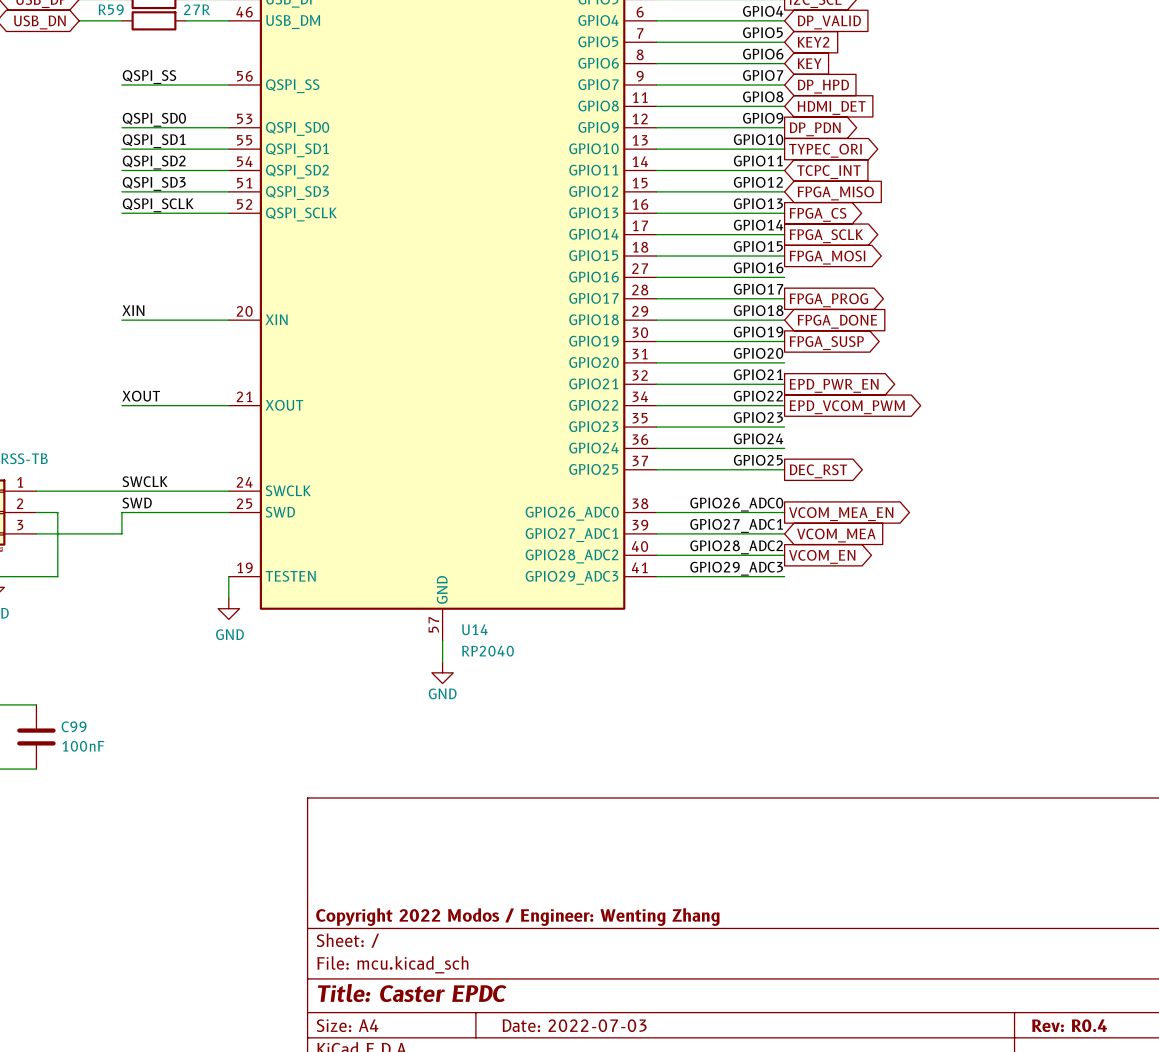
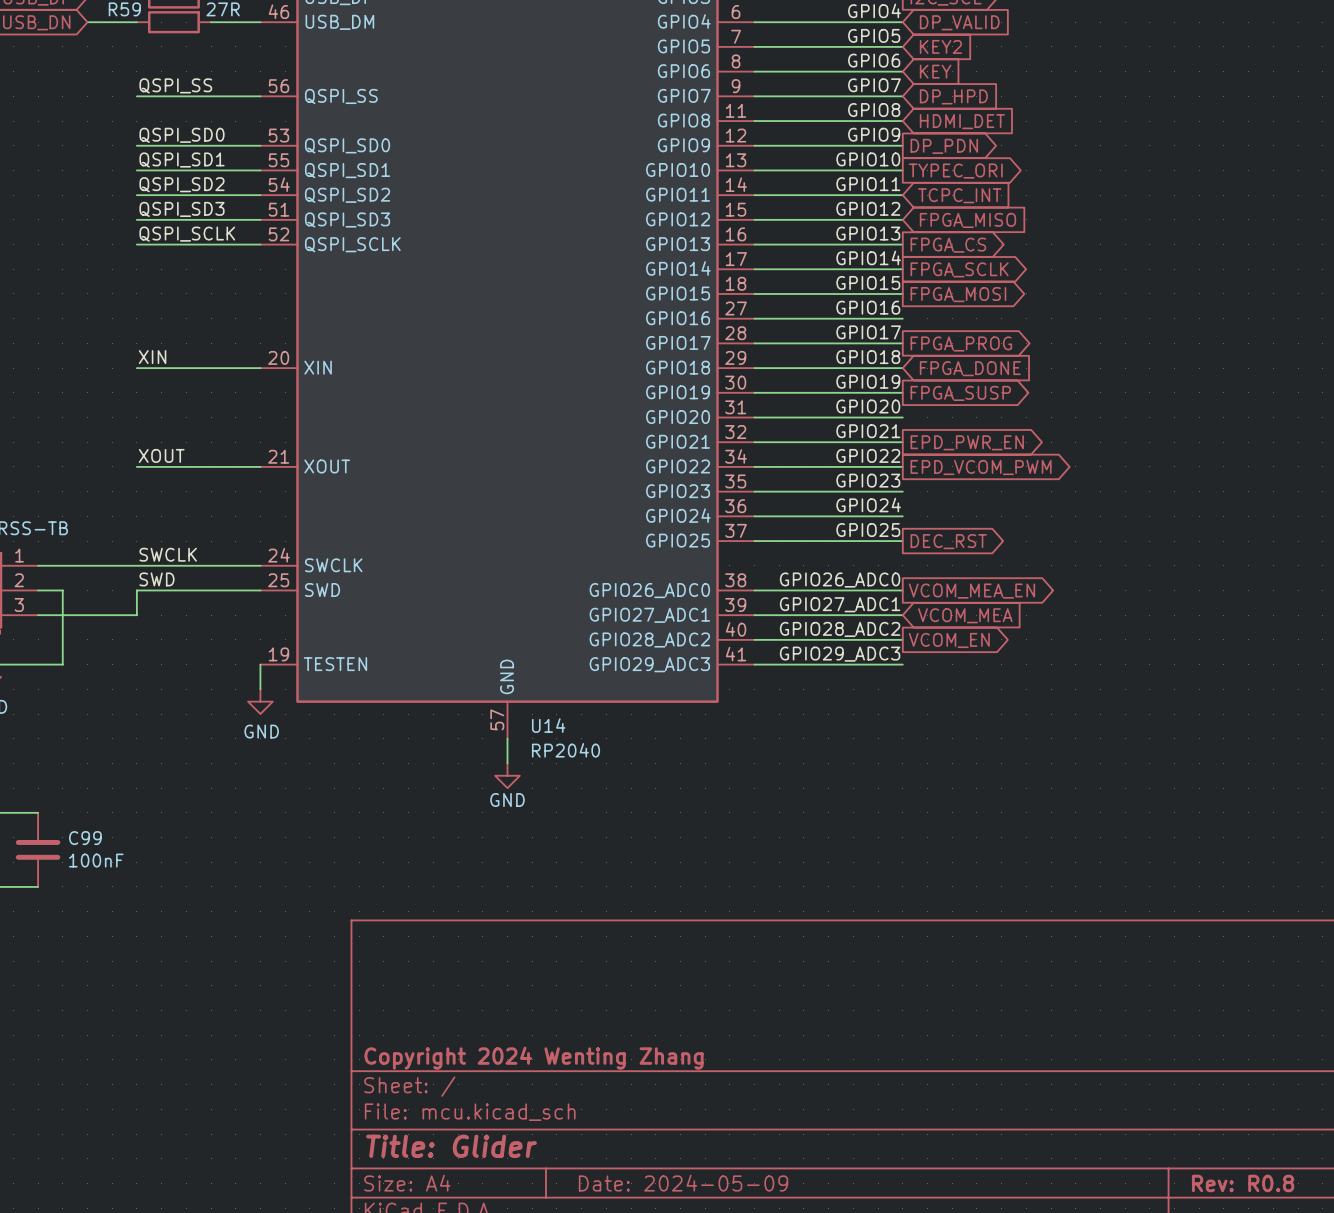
title block: Copyright 2022 Modos / Engineer: Wenting Zhang (517, 917) -> Copyright 2024 Wenting Zhang (534, 1058)
title block: Title: Caster EPDC (412, 992) -> Title: Glider (451, 1146)
title block: Date: 2022-07-03 (574, 1025) -> Date: 2024-05-09 (683, 1183)
title block: Rev: R0.4 (1069, 1025) -> Rev: R0.8 (1243, 1183)

